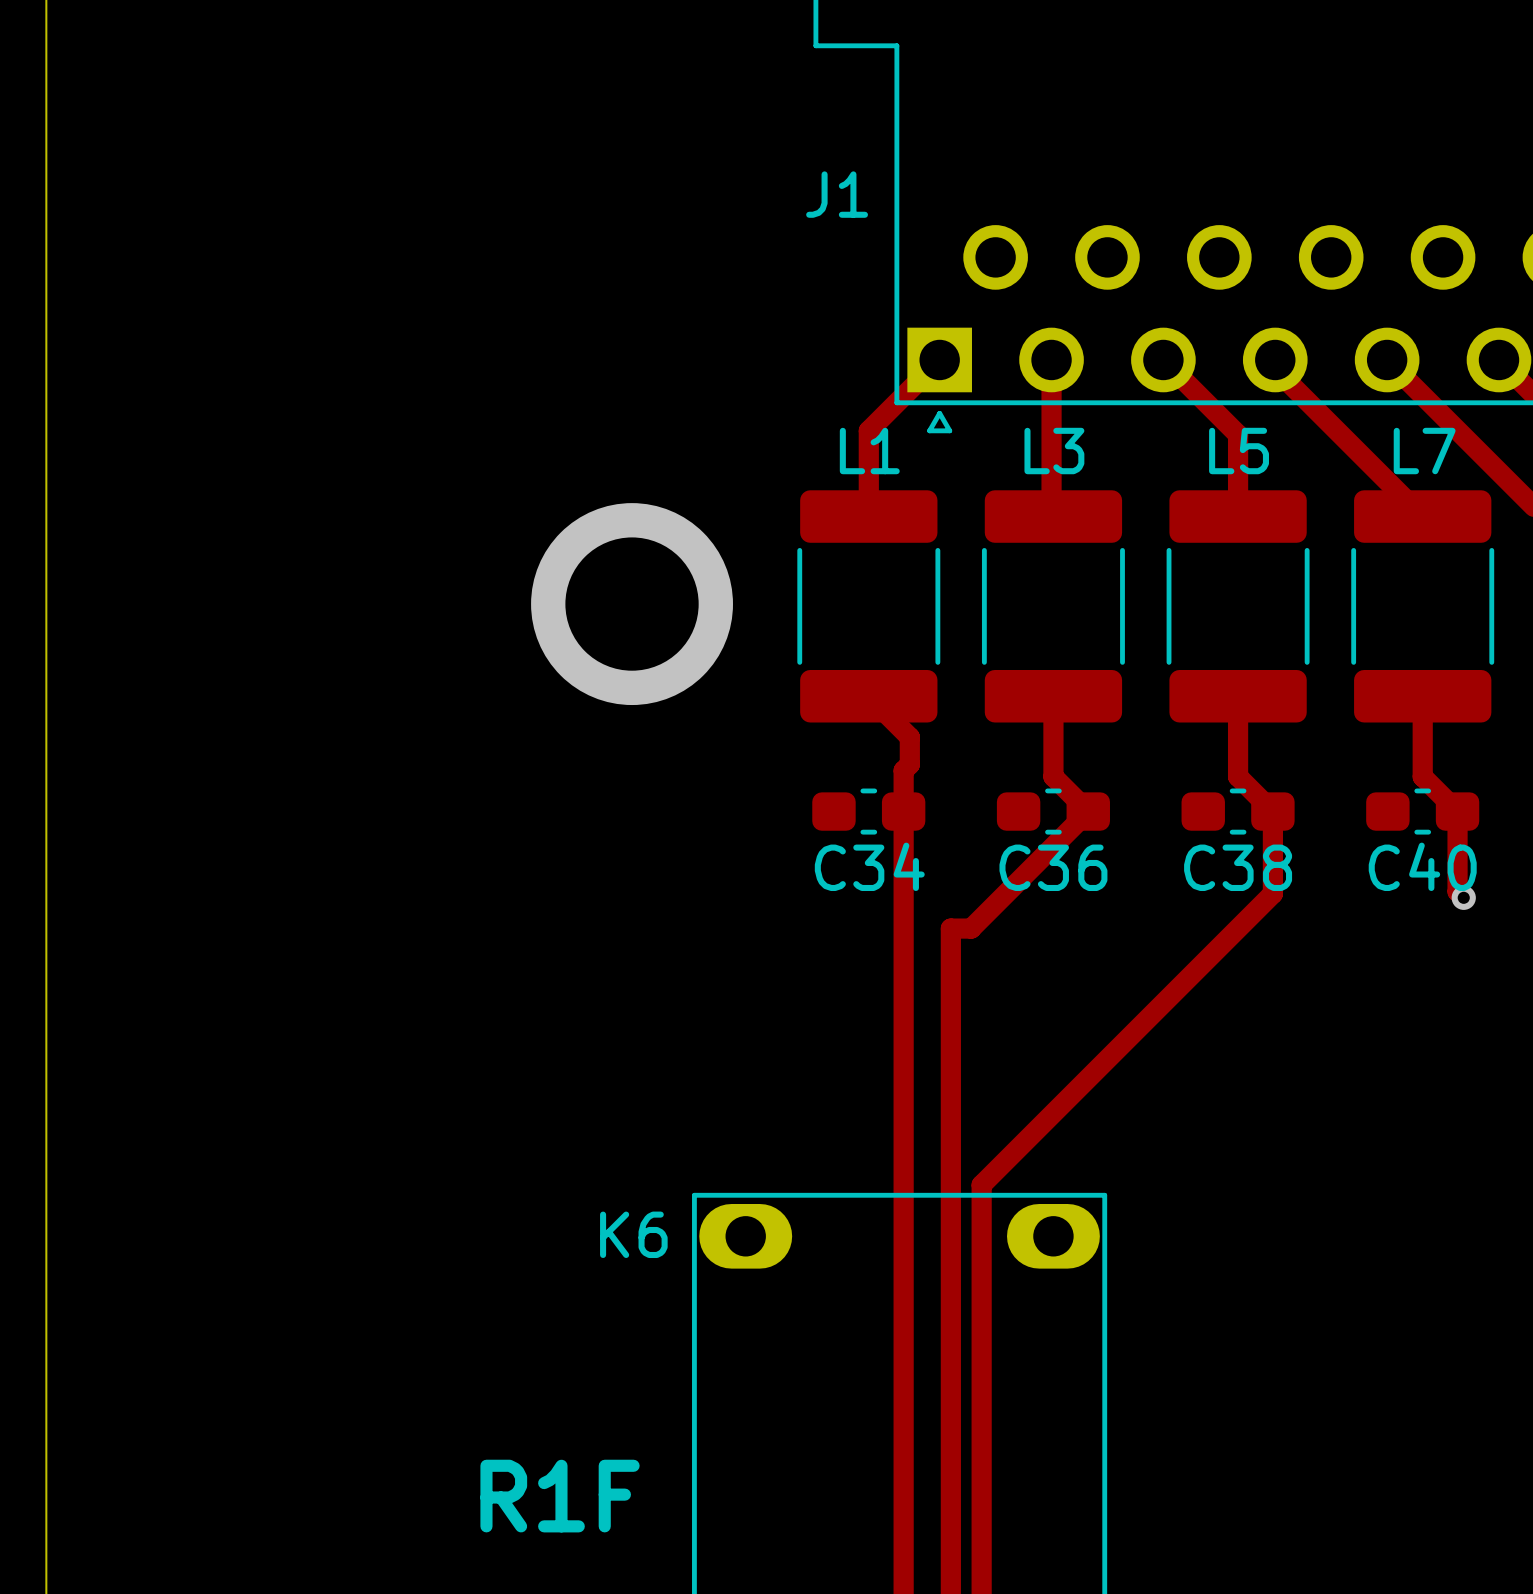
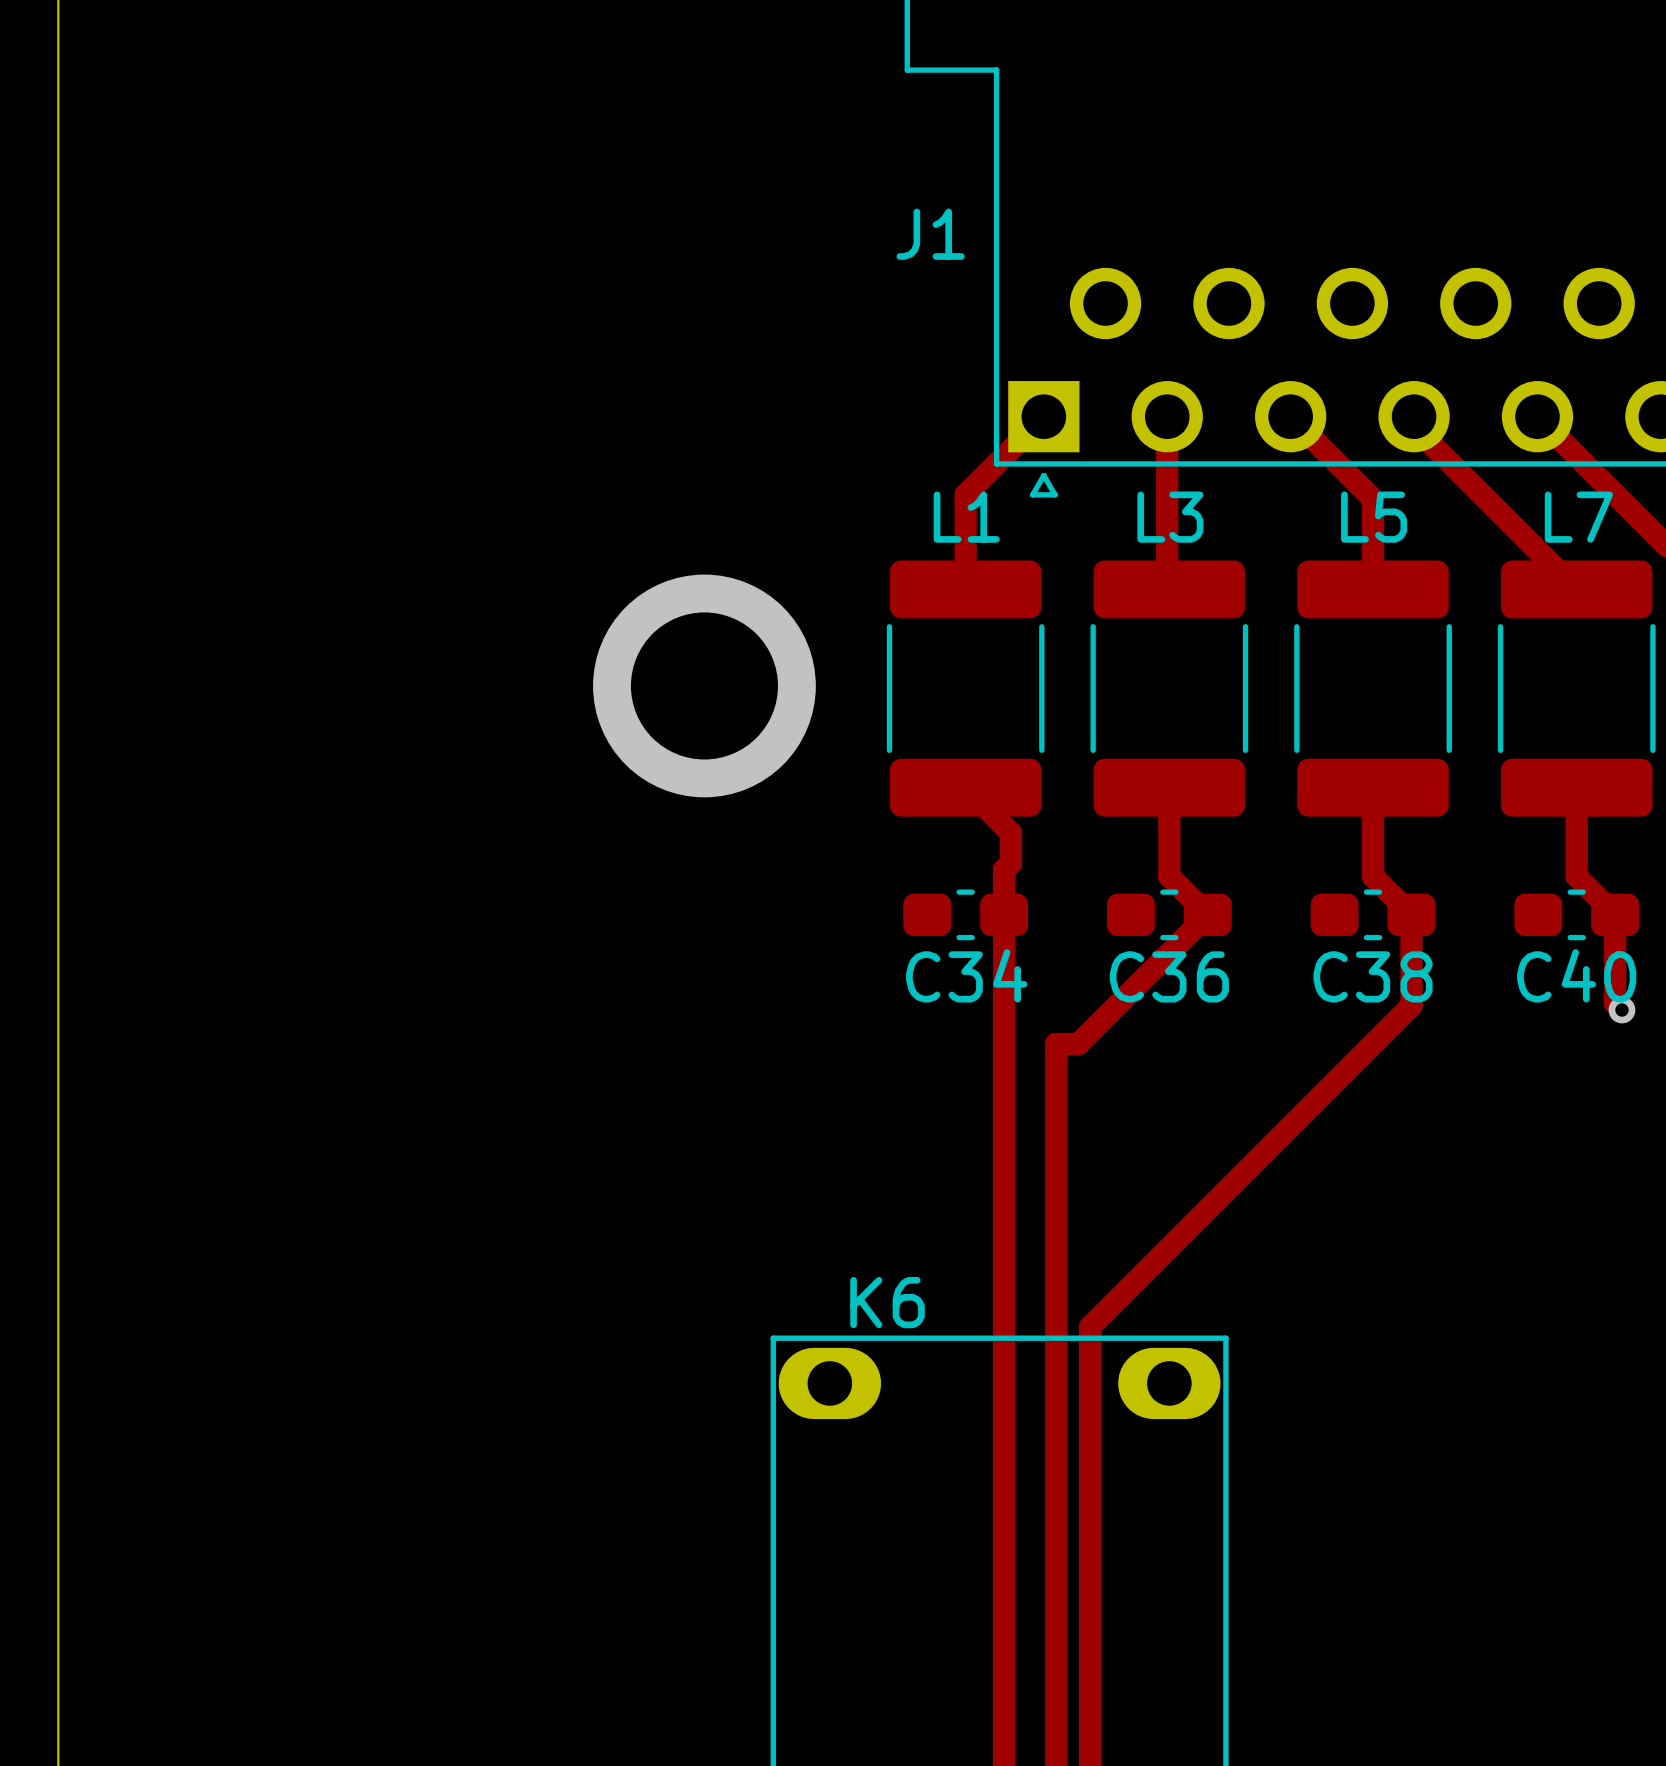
K6 name position: K6 (633, 1234) -> K6 (887, 1302)
text: R1F (560, 1496) -> none

